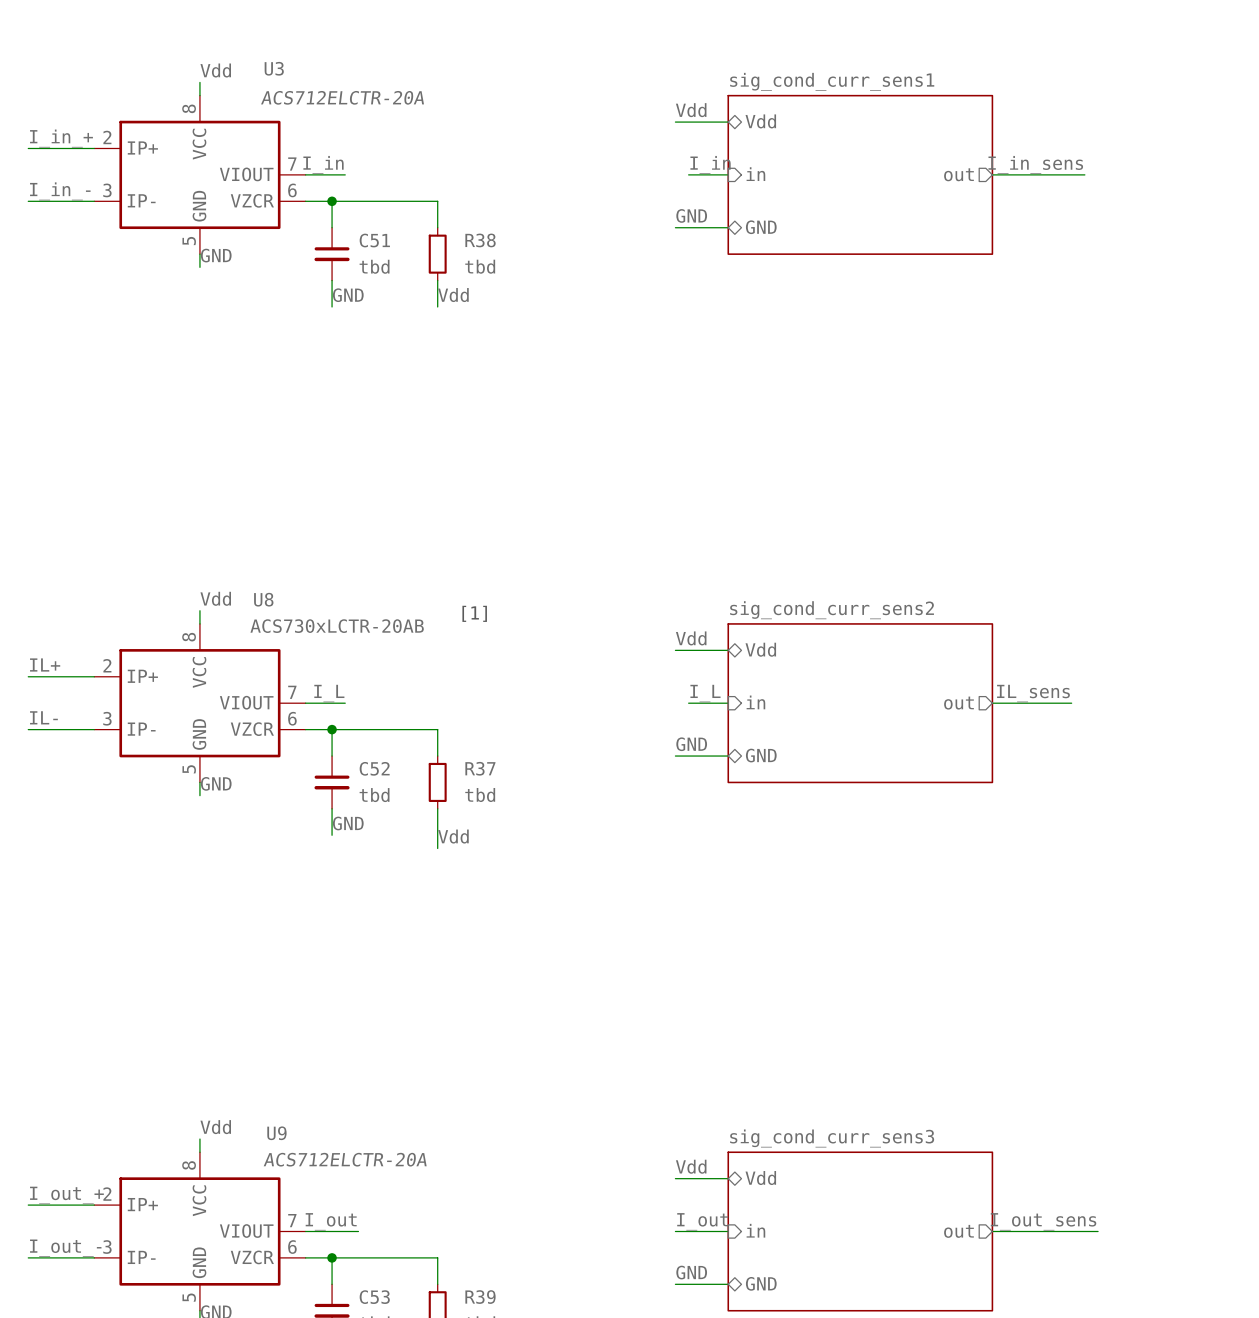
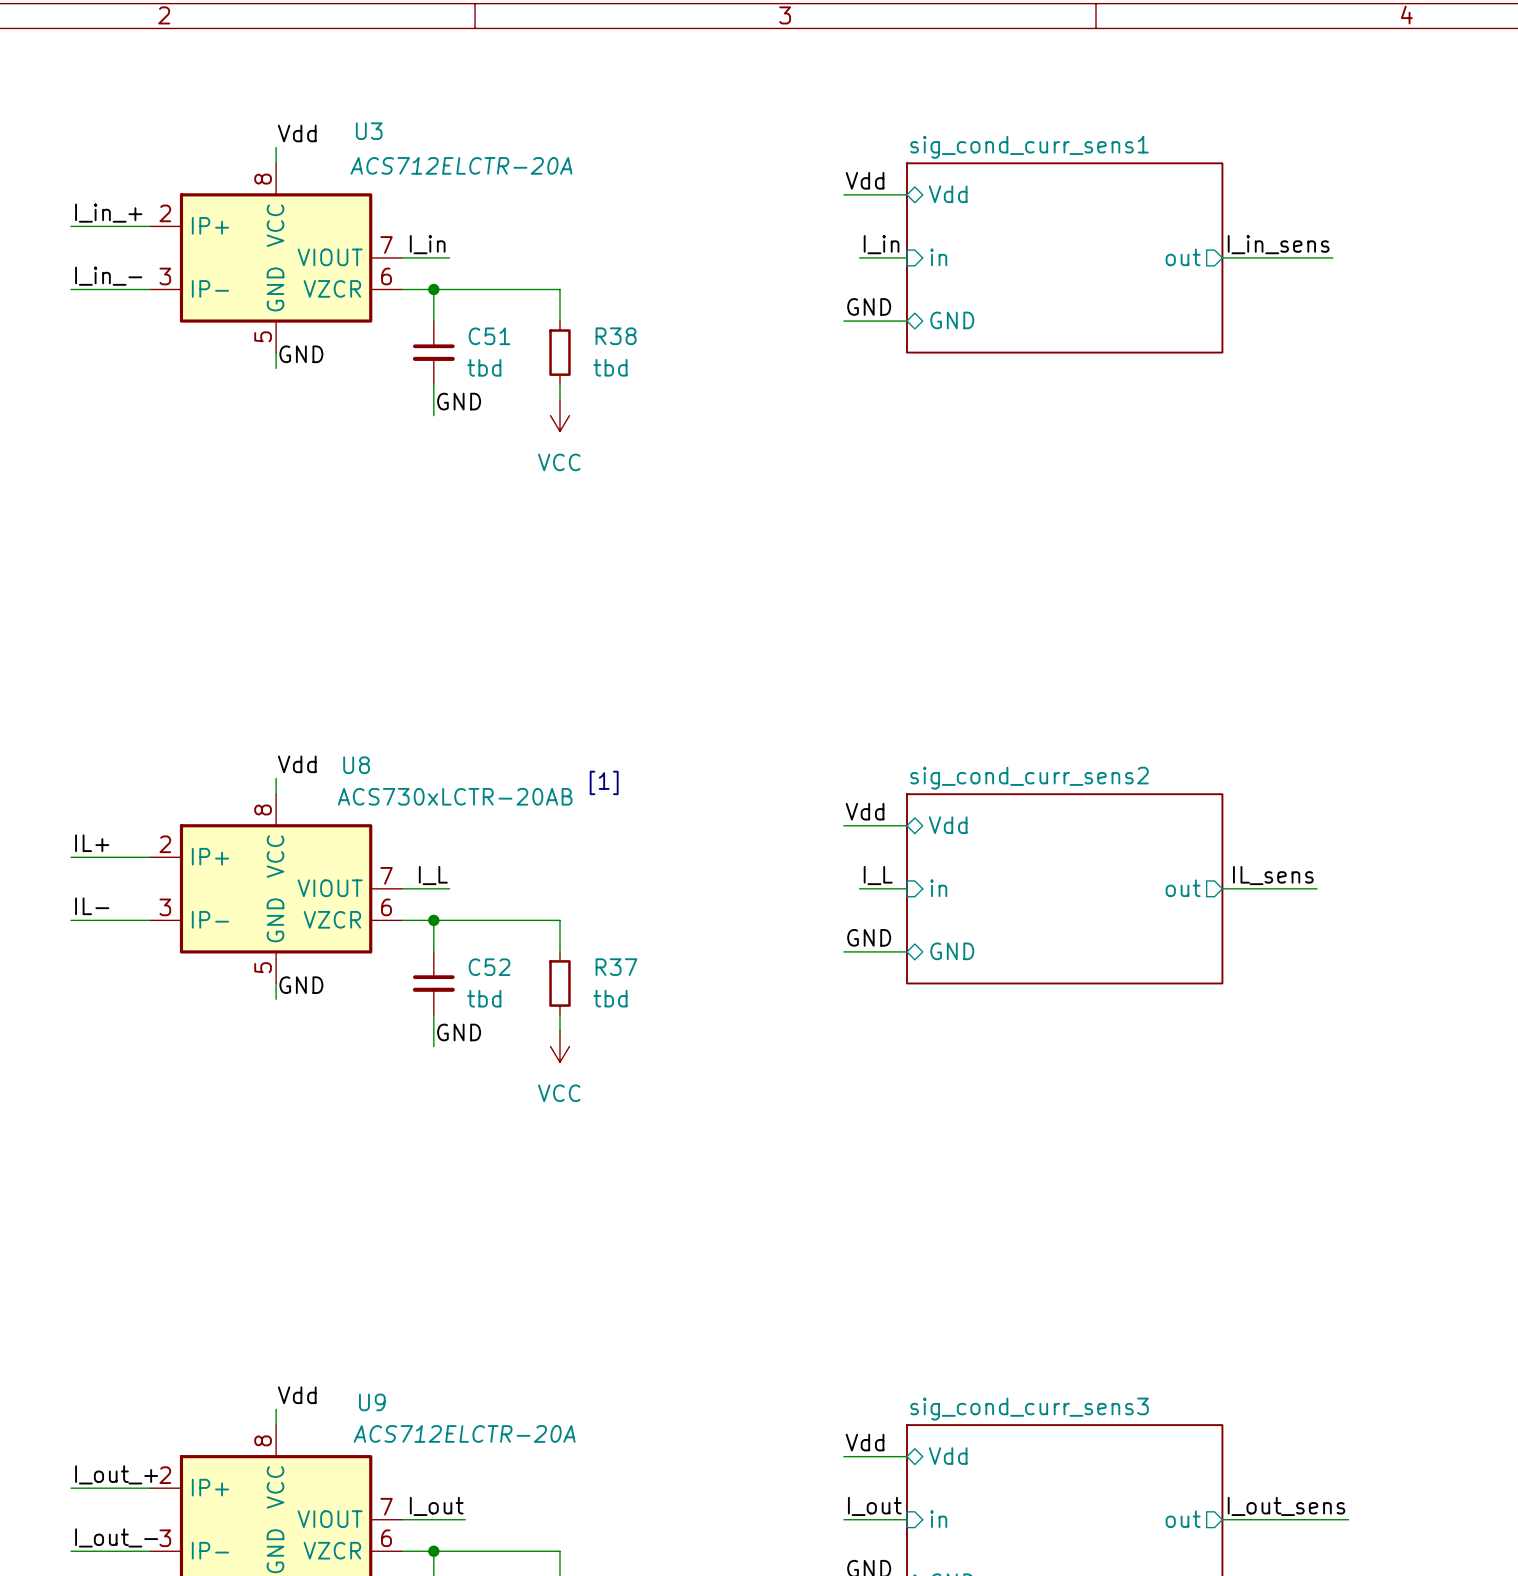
label: Vdd (453, 295) -> none
power symbol: none -> VCC (559, 415)
power symbol: none -> VCC (559, 1046)
label: Vdd (453, 836) -> none

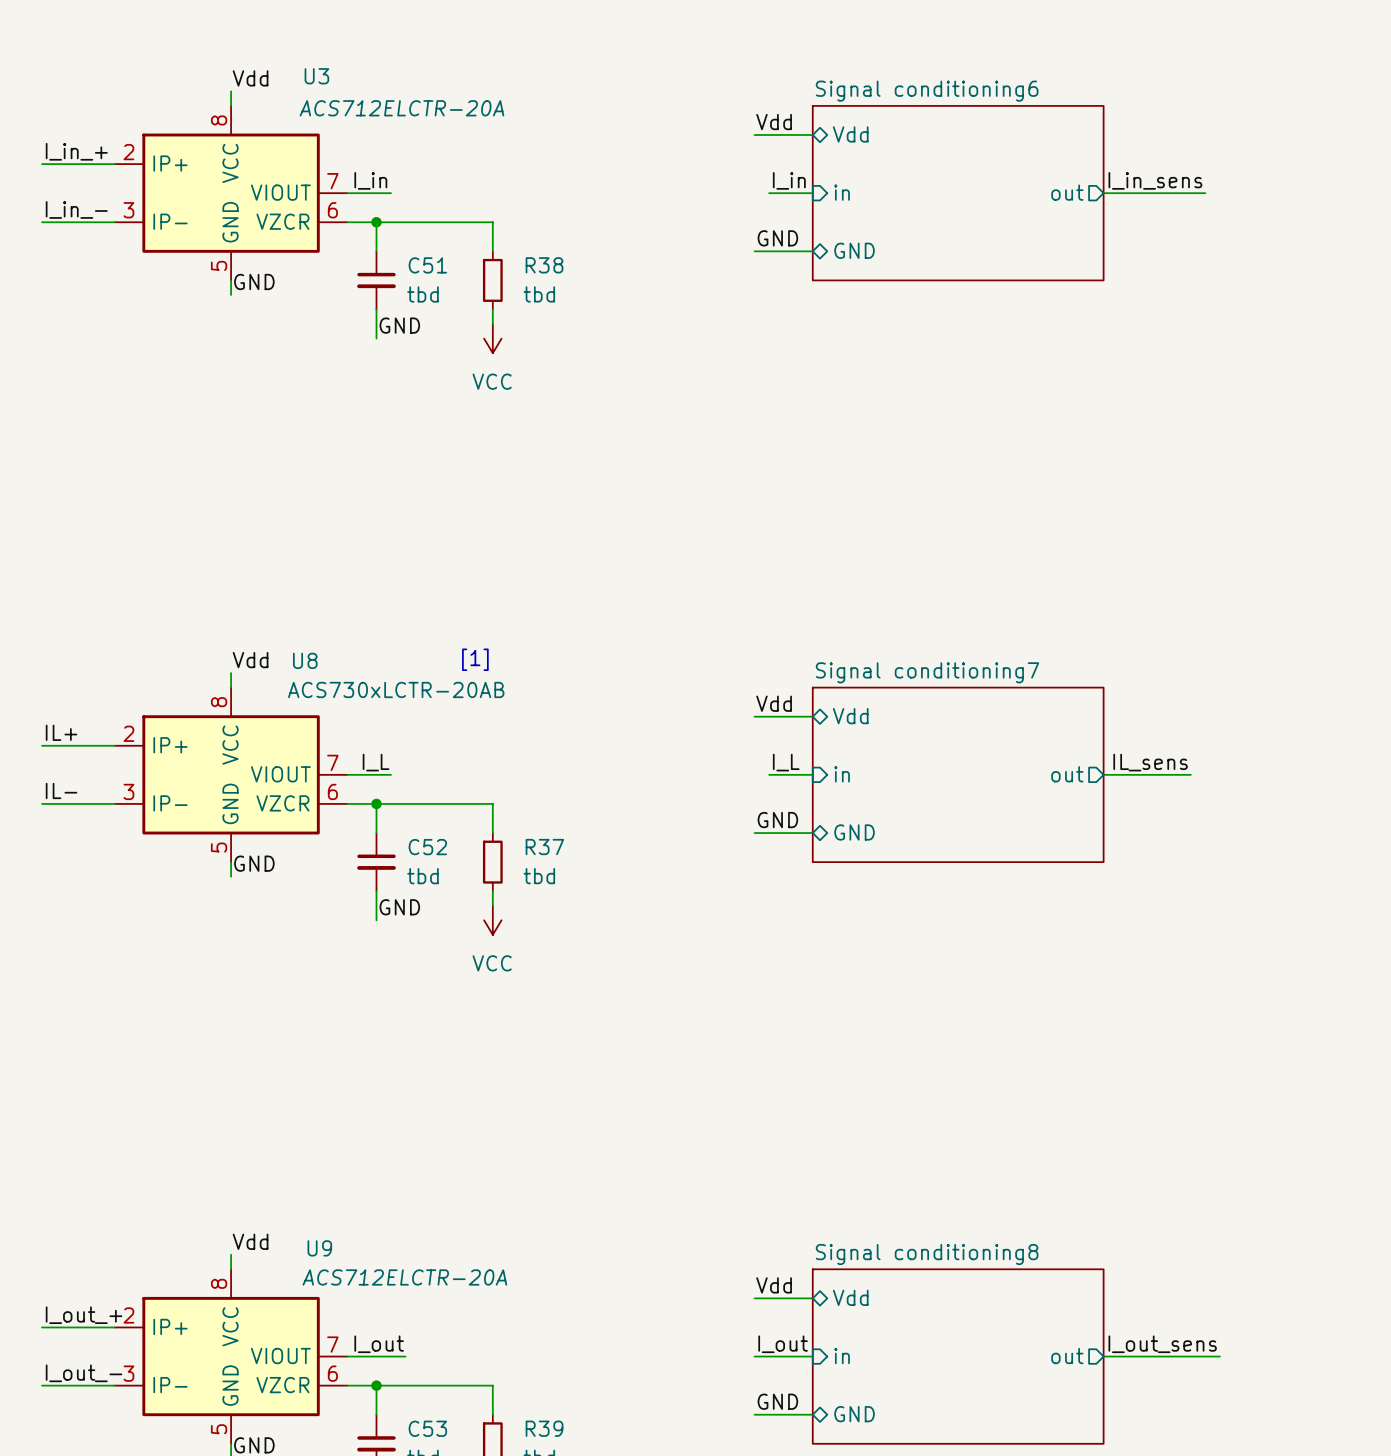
sheet sig_cond_curr_sens1 name: sig_cond_curr_sens1 (1029, 147) -> Signal conditioning6 (927, 91)
sheet sig_cond_curr_sens2 name: sig_cond_curr_sens2 (1029, 778) -> Signal conditioning7 (927, 672)
text position: [1] (604, 782) -> [1] (475, 659)
sheet sig_cond_curr_sens3 name: sig_cond_curr_sens3 (1029, 1409) -> Signal conditioning8 (927, 1254)

